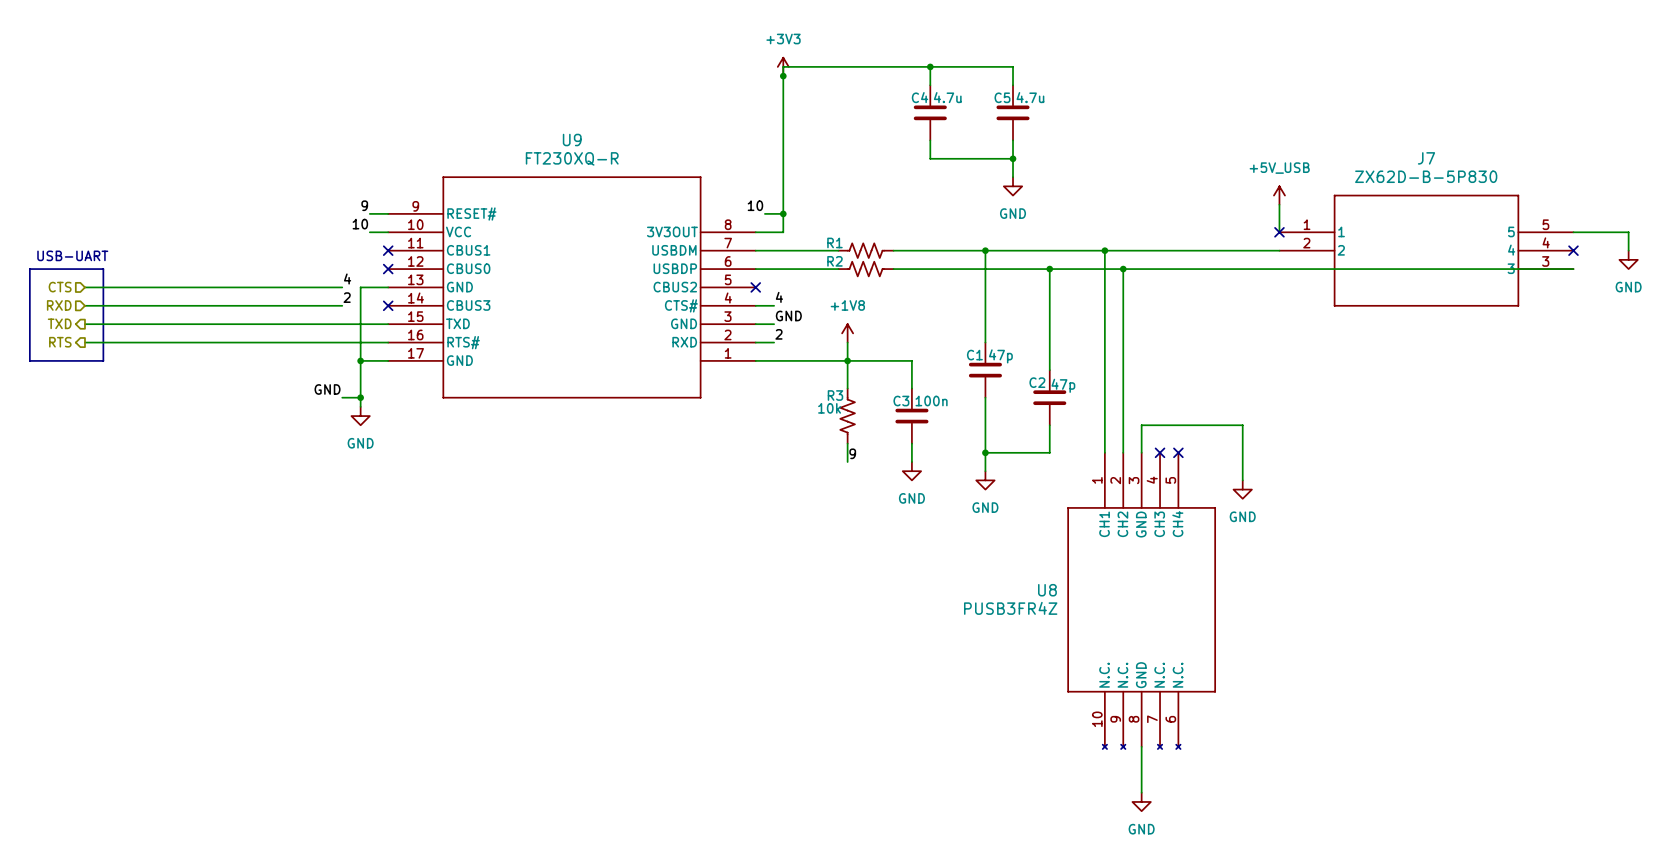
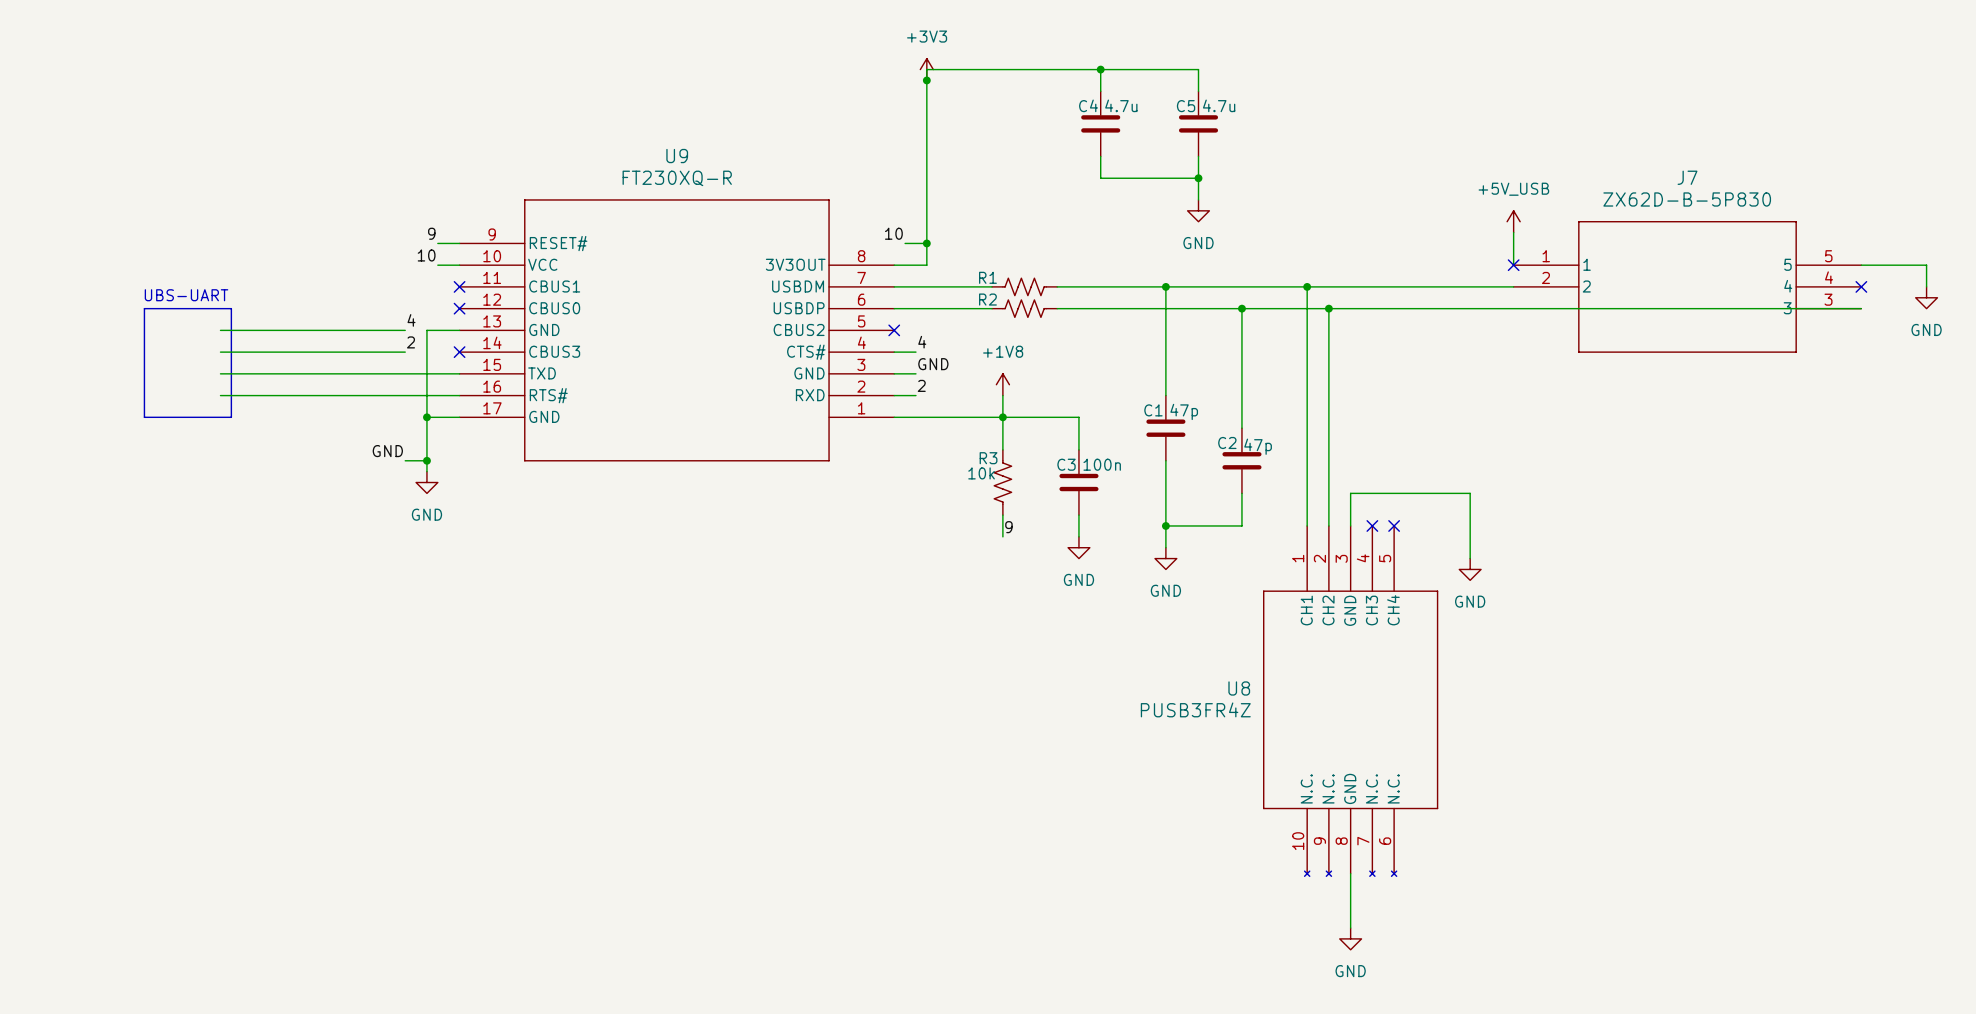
text: USB-UART (72, 255) -> none
text: none -> UBS-UART (186, 295)
line: (29, 269) (103, 269) (103, 360) (29, 360) (29, 269) -> (144, 308) (231, 308) (231, 417) (144, 417) (144, 308)
hierarchical label: CTS (60, 287) -> none
wire: (84, 287) (186, 287) -> none
hierarchical label: RXD (59, 305) -> none
wire: (84, 305) (186, 305) -> none
hierarchical label: TXD (59, 323) -> none
wire: (84, 324) (186, 324) -> none
hierarchical label: RTS (60, 342) -> none
wire: (84, 342) (186, 342) -> none

